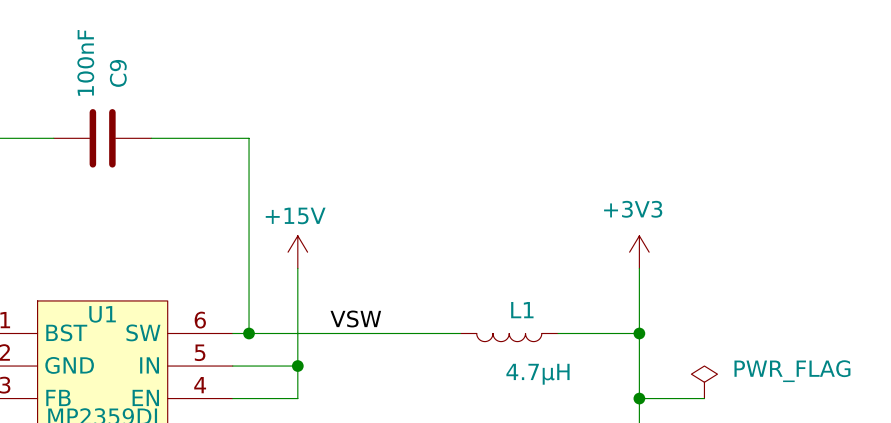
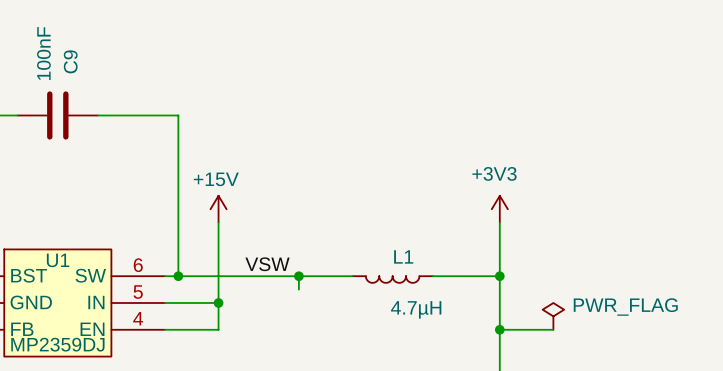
wire: none -> (298, 276) (298, 289)
junction: none -> (298, 276)

